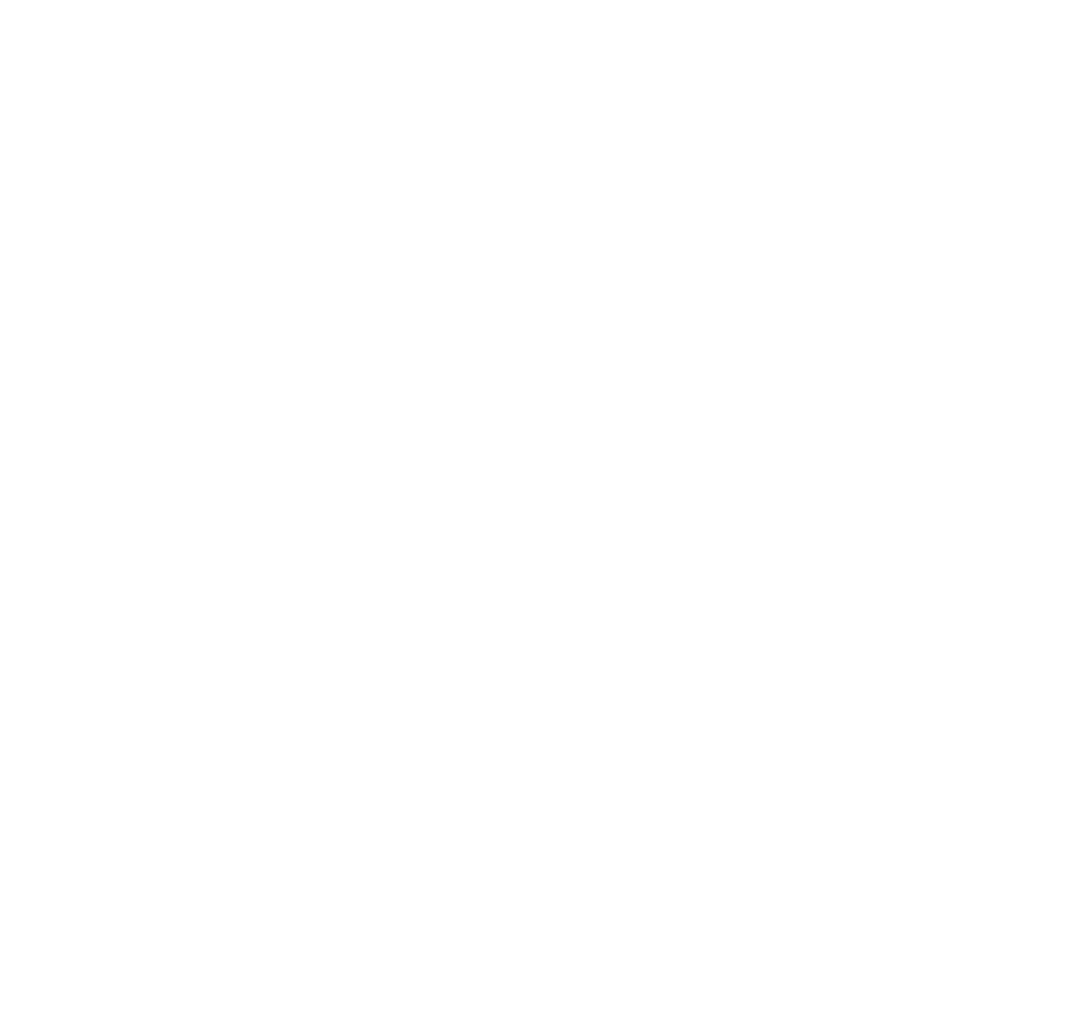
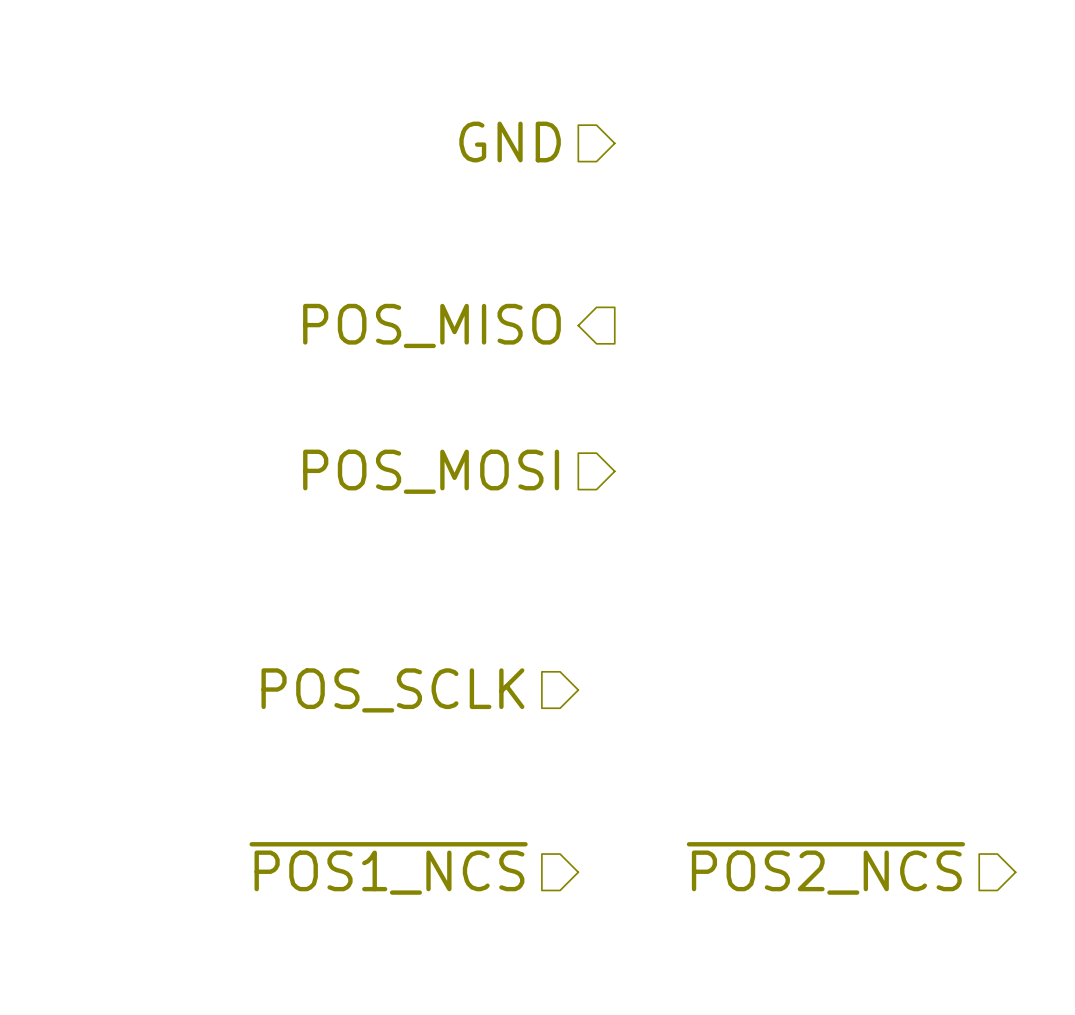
hierarchical label: none -> GND (510, 142)
hierarchical label: none -> POS_MISO (431, 325)
hierarchical label: none -> POS_MOSI (431, 471)
hierarchical label: none -> POS_SCLK (392, 690)
hierarchical label: none -> ~{POS1_NCS} (388, 868)
hierarchical label: none -> ~{POS2_NCS} (825, 868)

